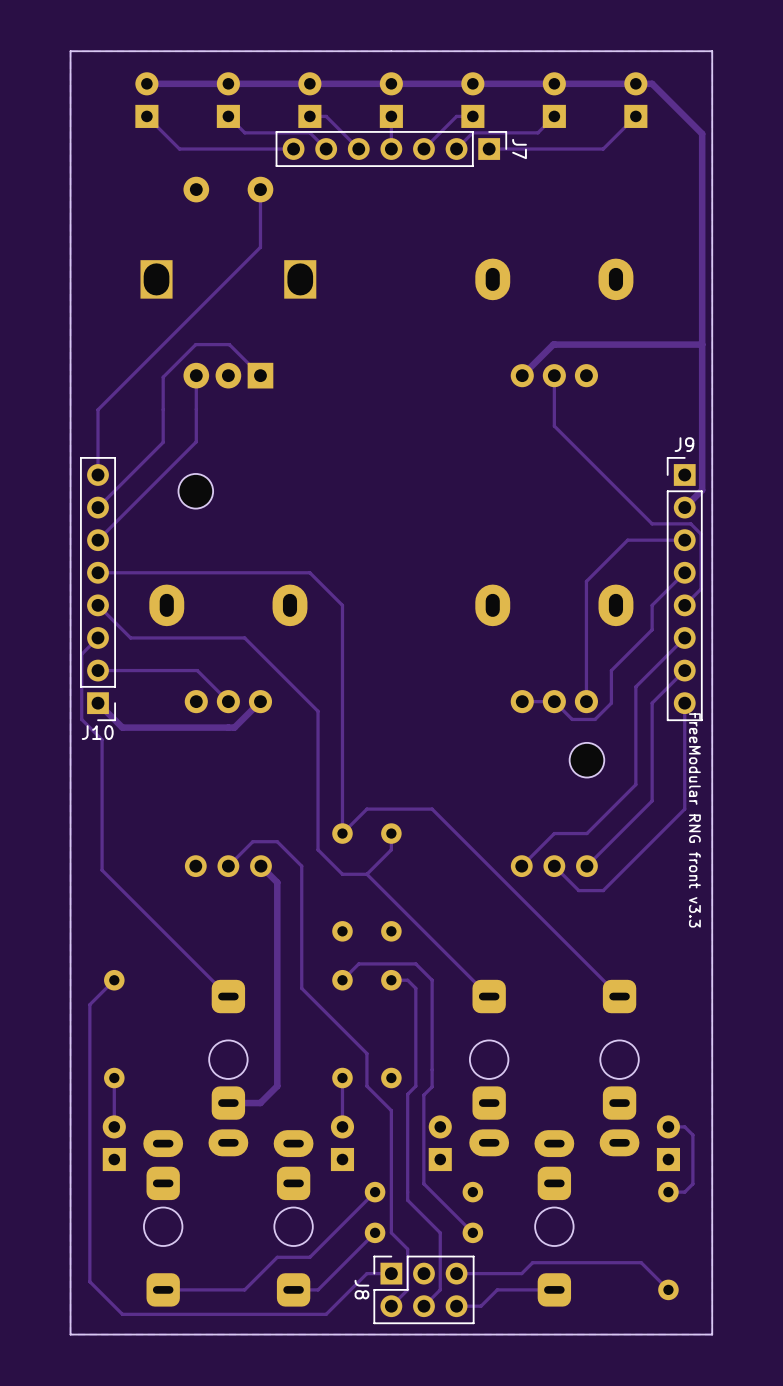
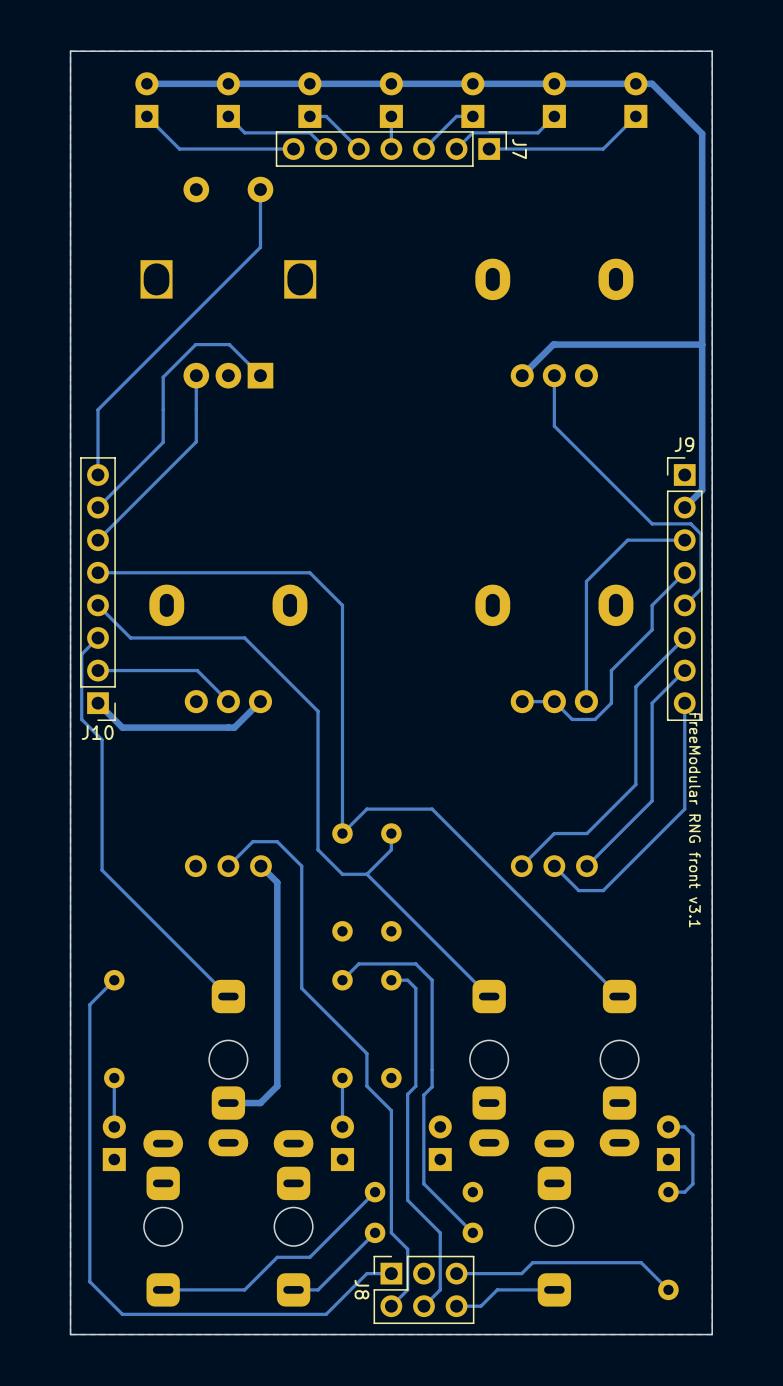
part: (195, 491) -> none
part: (586, 760) -> none
text: FreeModular RNG front v3.3 (694, 820) -> FreeModular RNG front v3.1 (694, 820)

